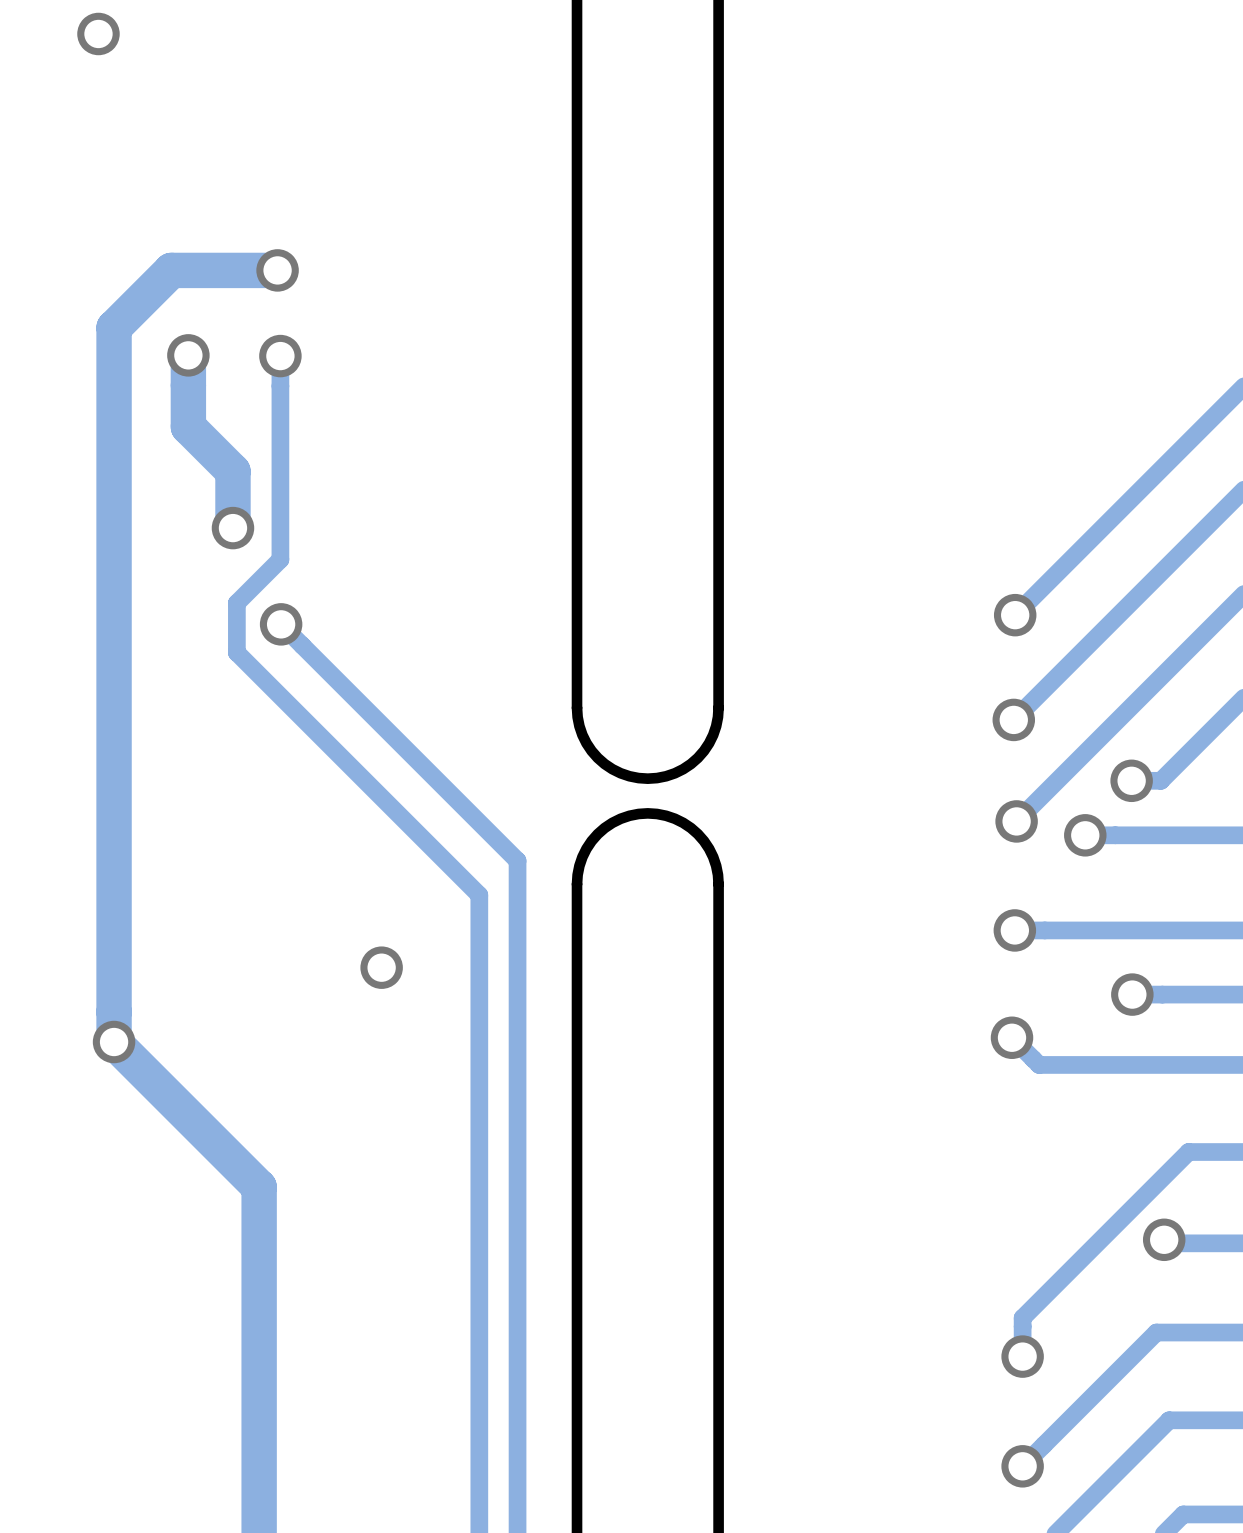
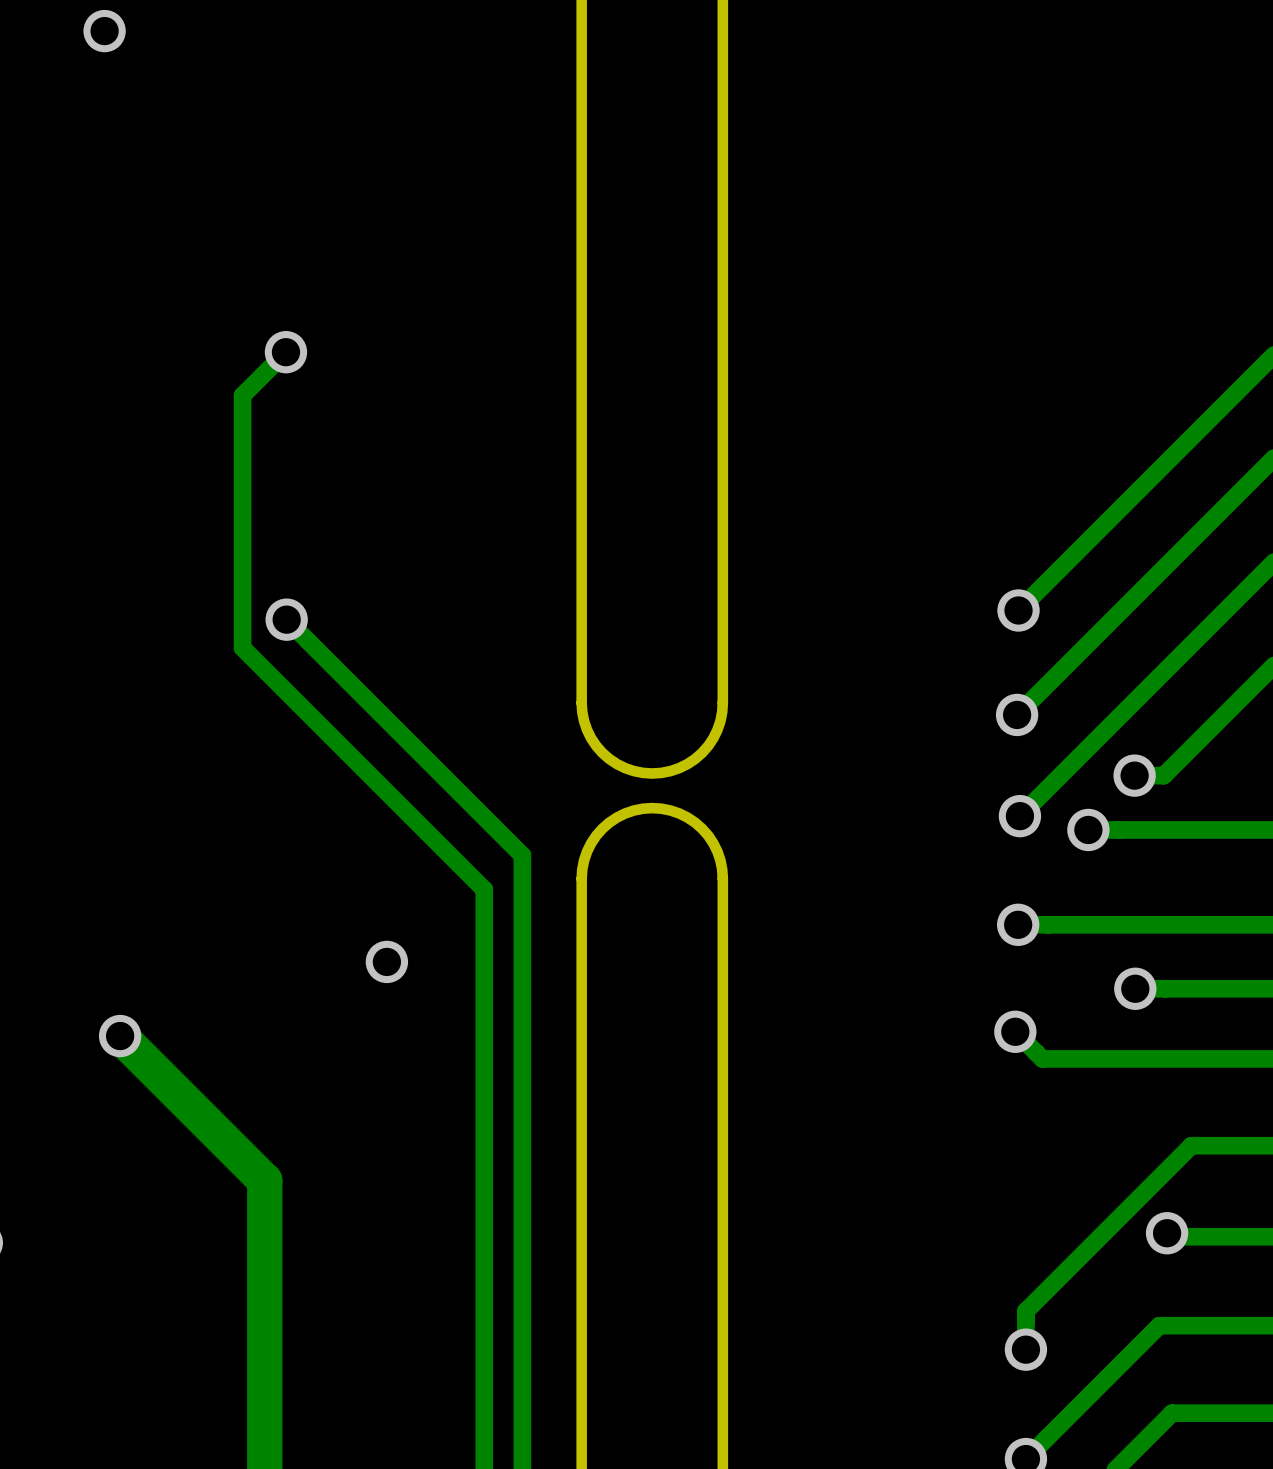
track: (277, 270) (171, 270) (114, 327) (114, 1042) -> none
via: (277, 270) -> none
track: (188, 355) (188, 426) (232, 471) (232, 528) -> none
via: (188, 355) -> none
track: (280, 356) (280, 559) (236, 603) -> (285, 352) (242, 395) (242, 598)
via: (232, 528) -> none

